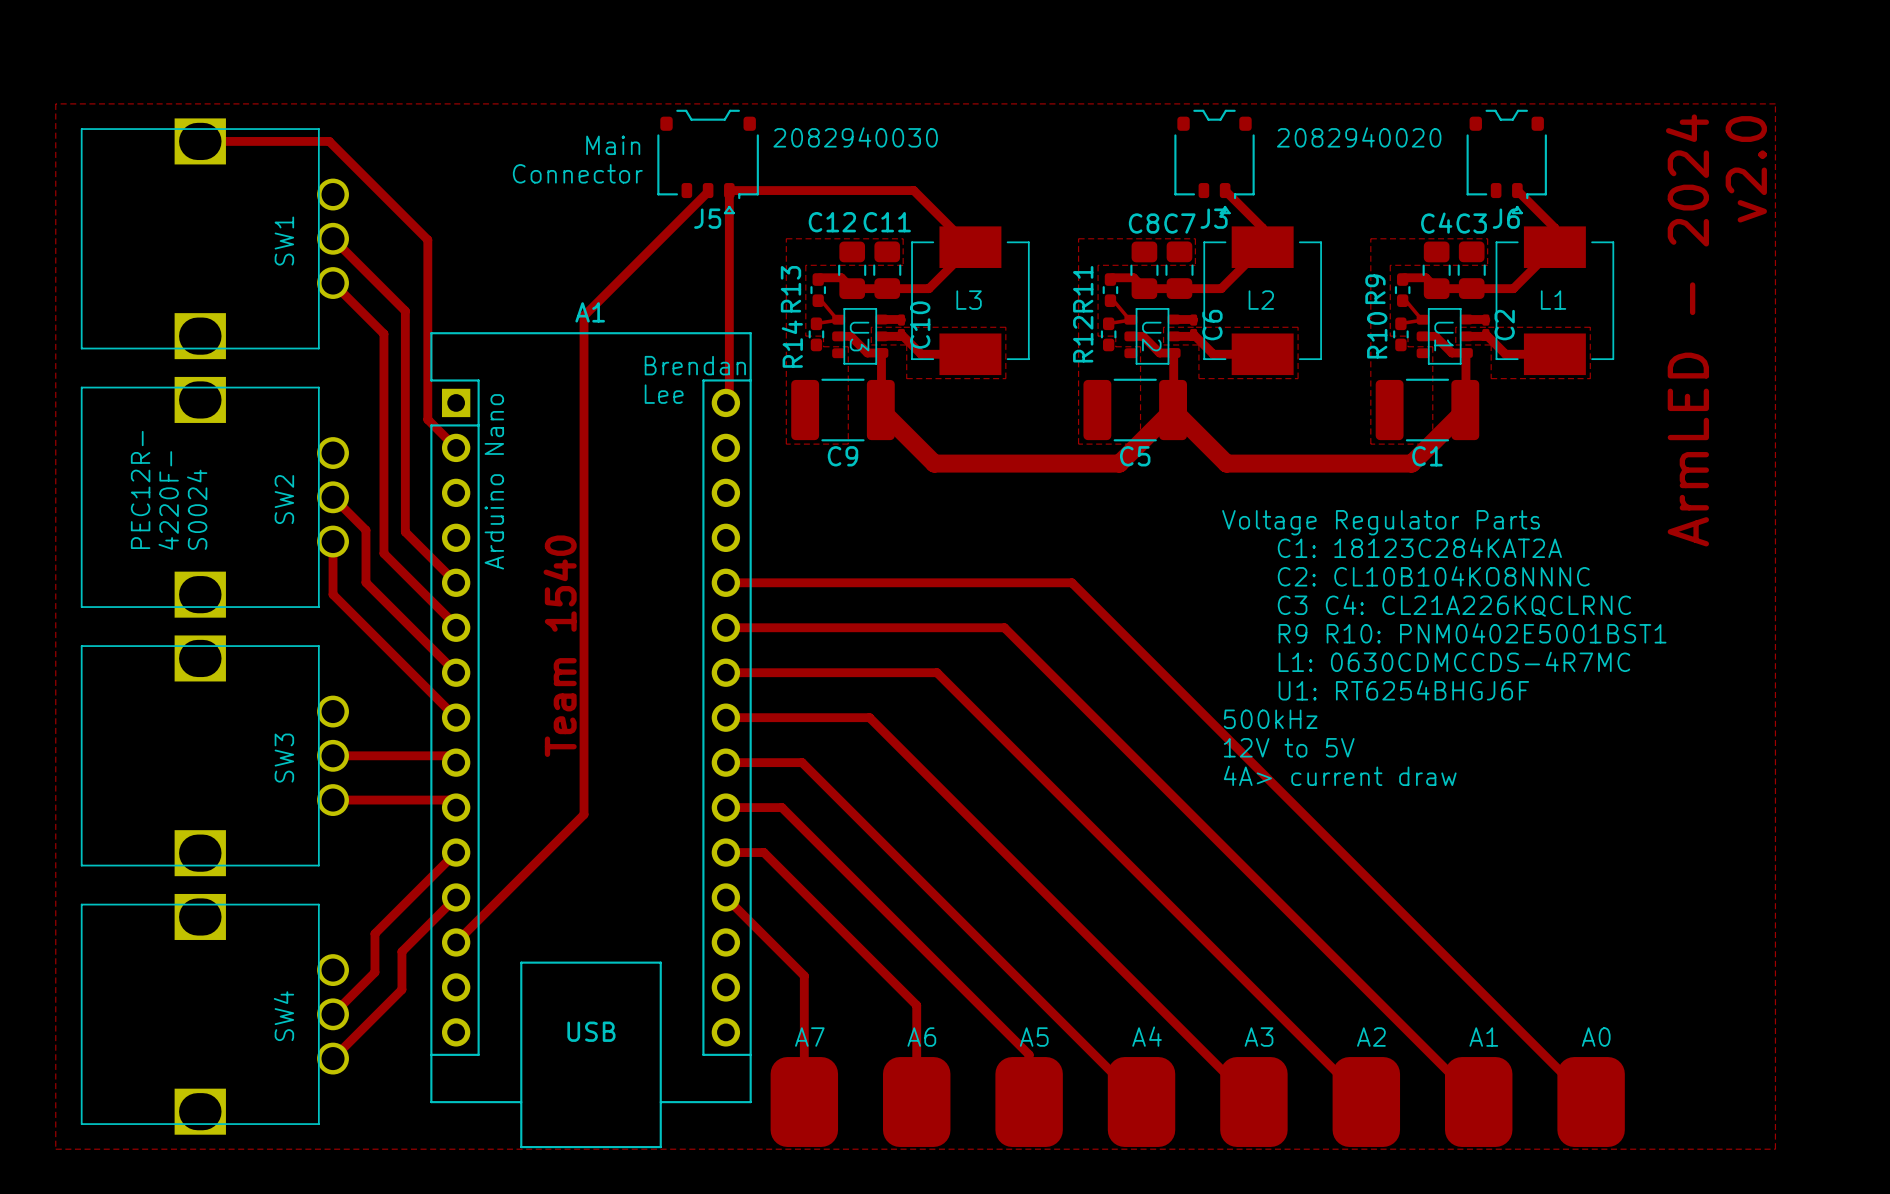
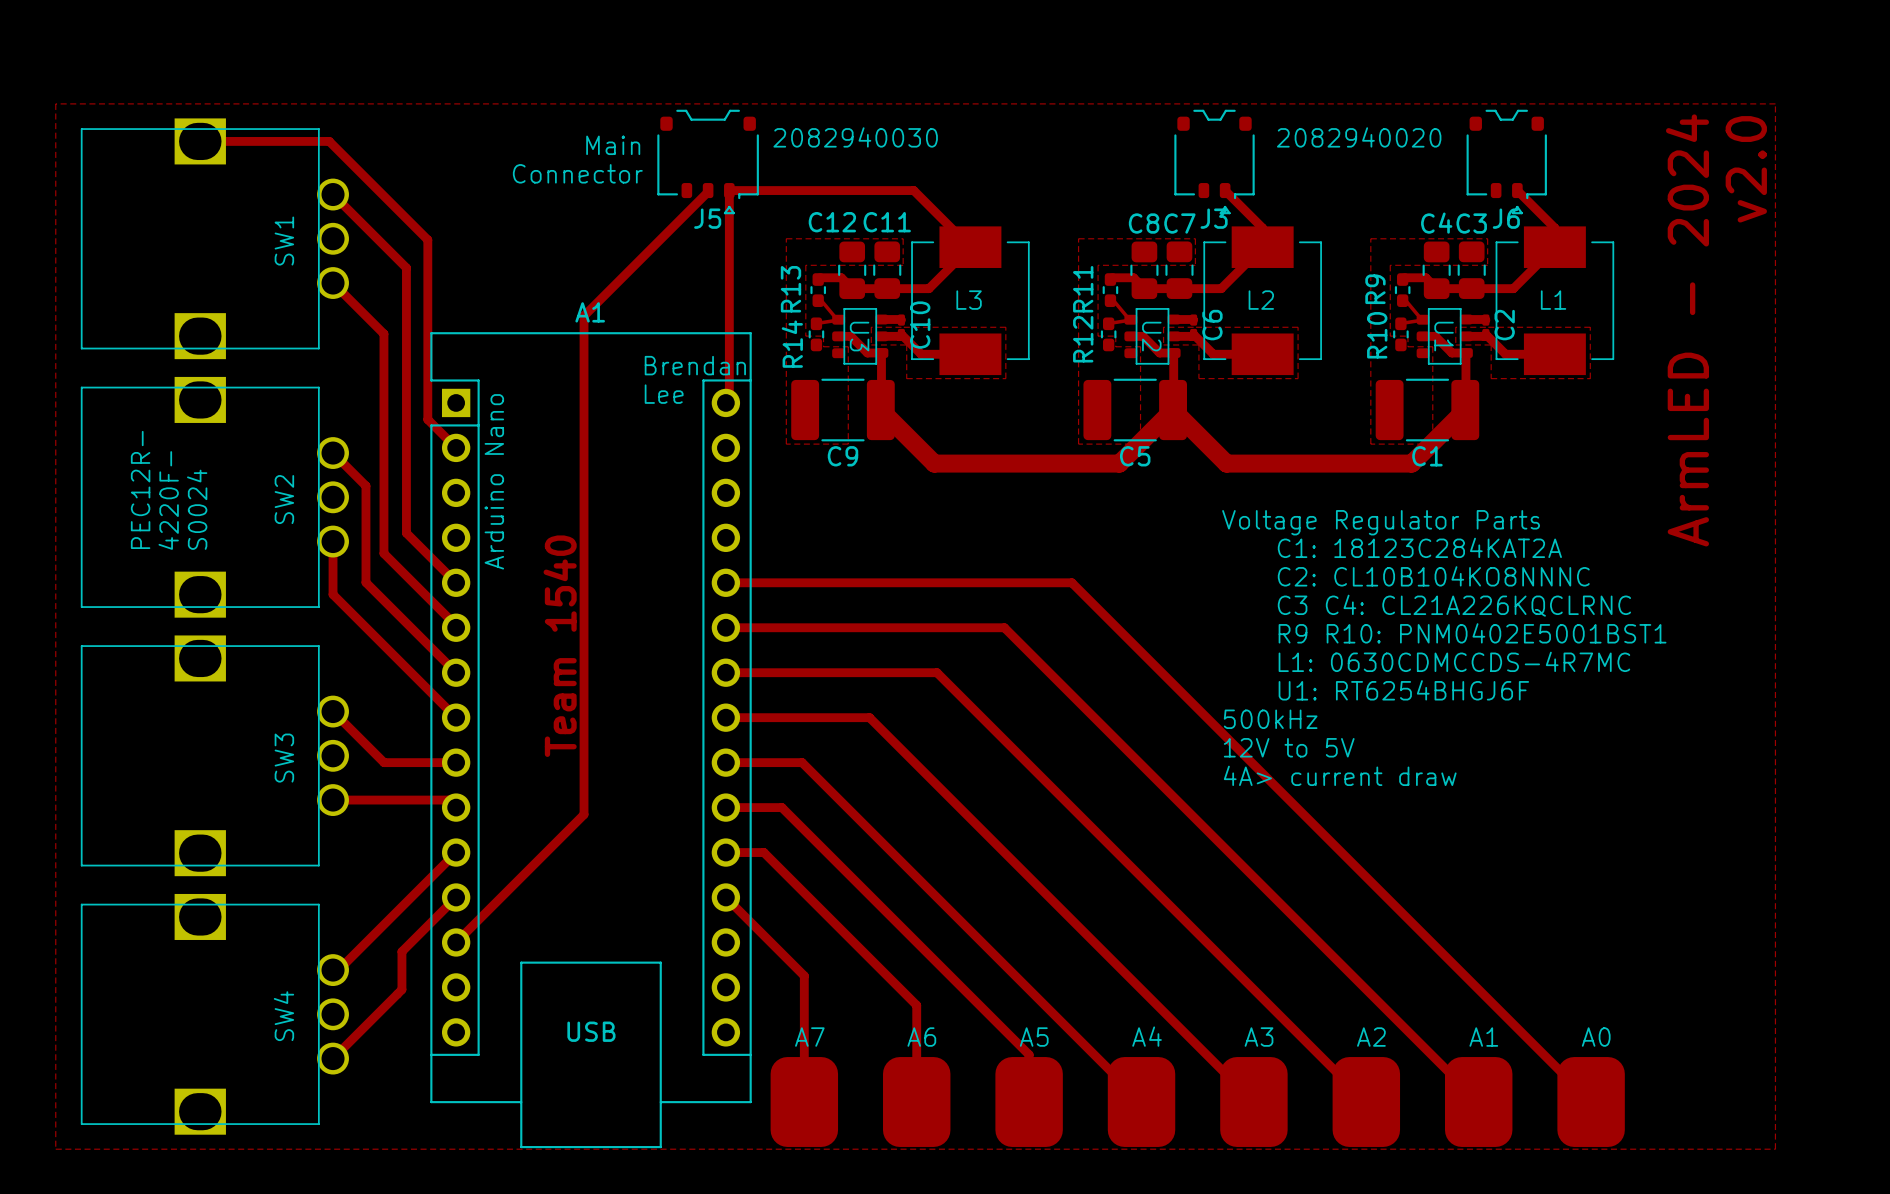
top track: (333, 238) (405, 311) (406, 533) -> (333, 194) (406, 267) (406, 533)
top track: (333, 497) (365, 530) -> (333, 453) (365, 485) (365, 530)
top track: (333, 755) (449, 755) (456, 762) -> (333, 711) (384, 762) (456, 762)
top track: (374, 933) (374, 972) (333, 1014) -> (374, 933) (338, 970) (333, 970)

